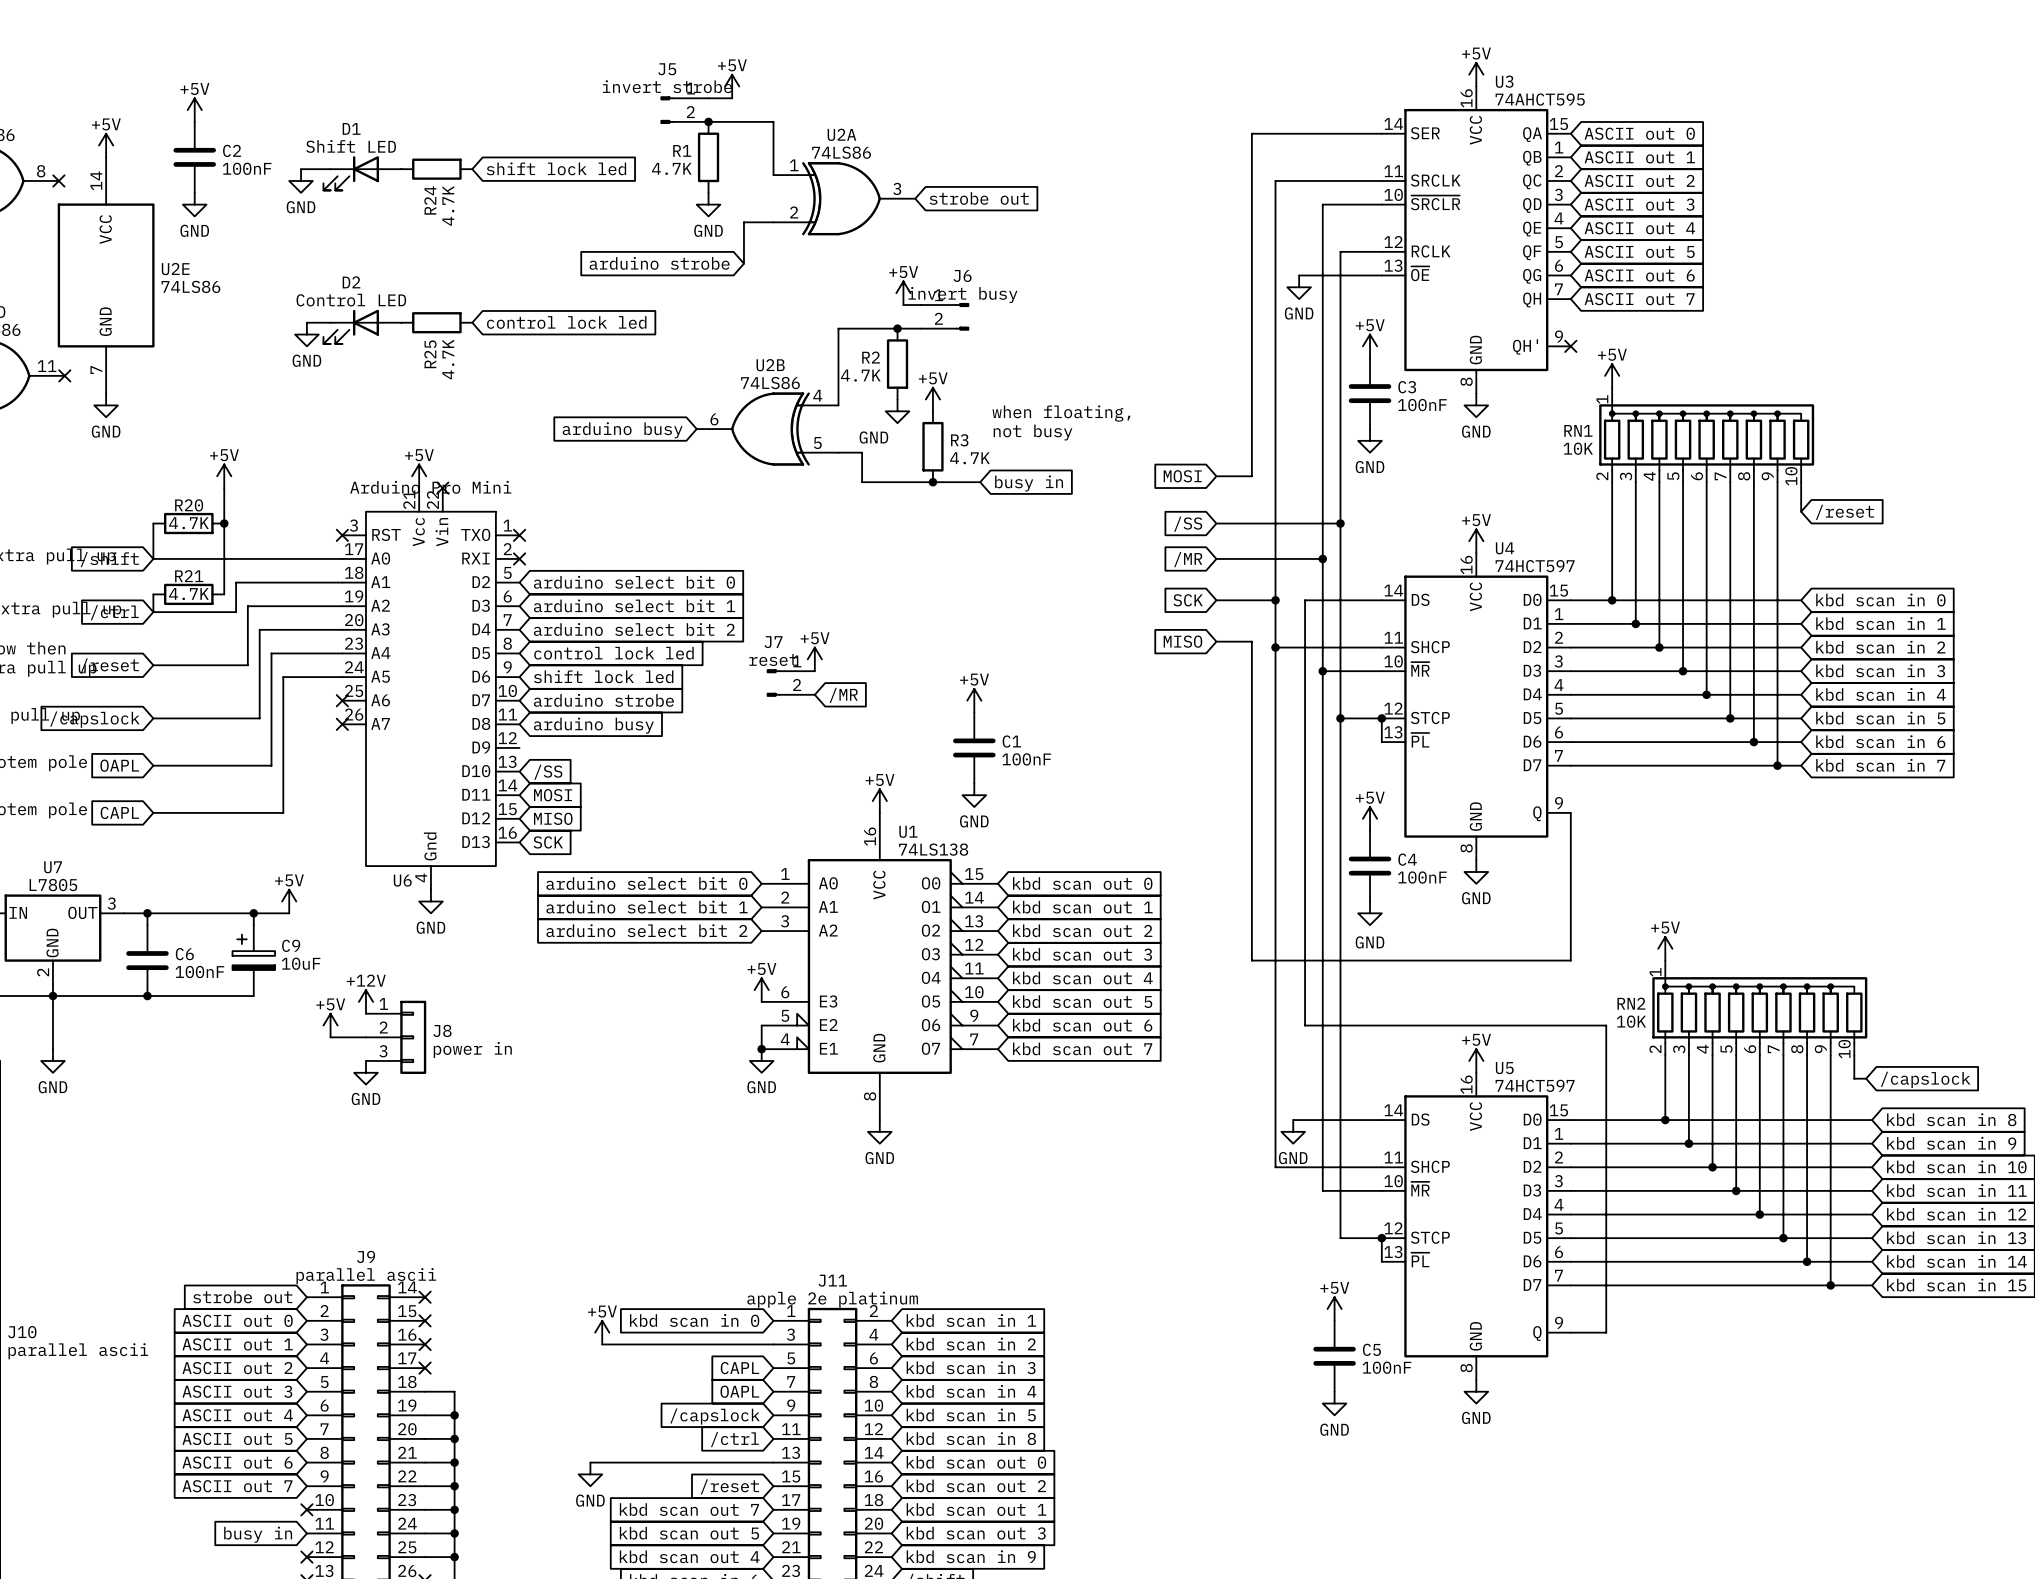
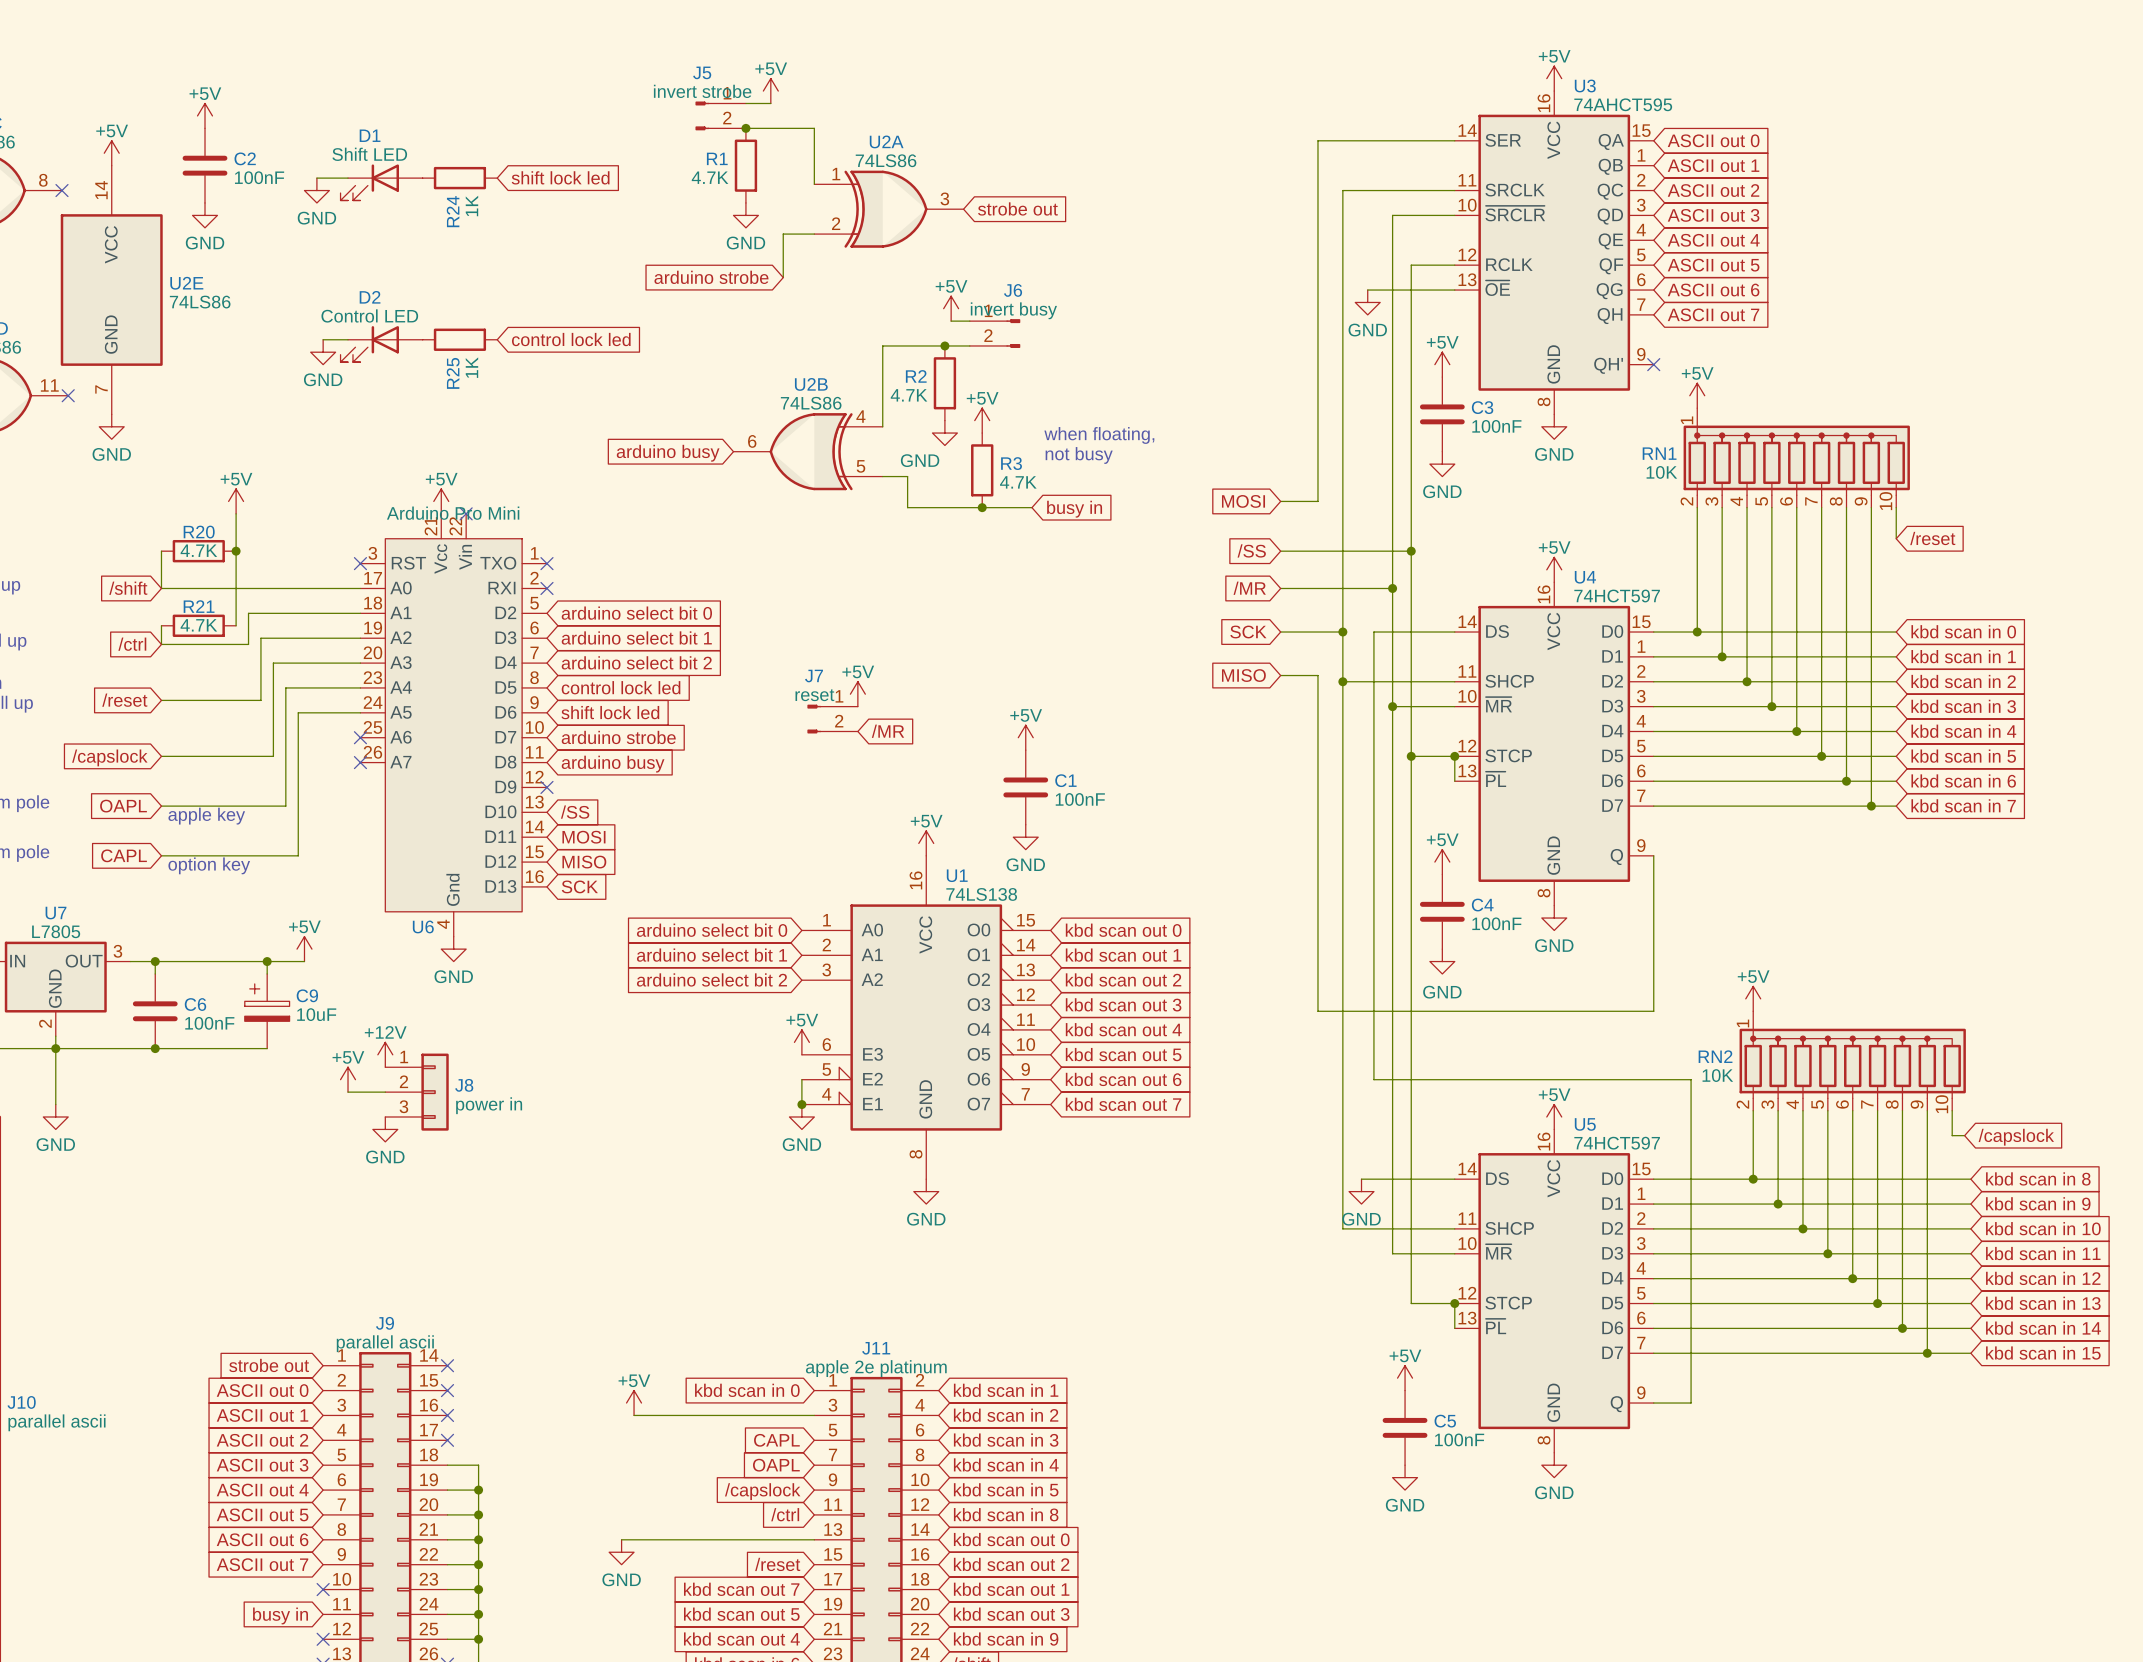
R24 value: 4.7K (448, 205) -> 1K (471, 205)
R25 value: 4.7K (448, 359) -> 1K (471, 367)
no-connect mark: none -> (546, 787)
text: none -> apple key (206, 816)
text: none -> option key (209, 865)

